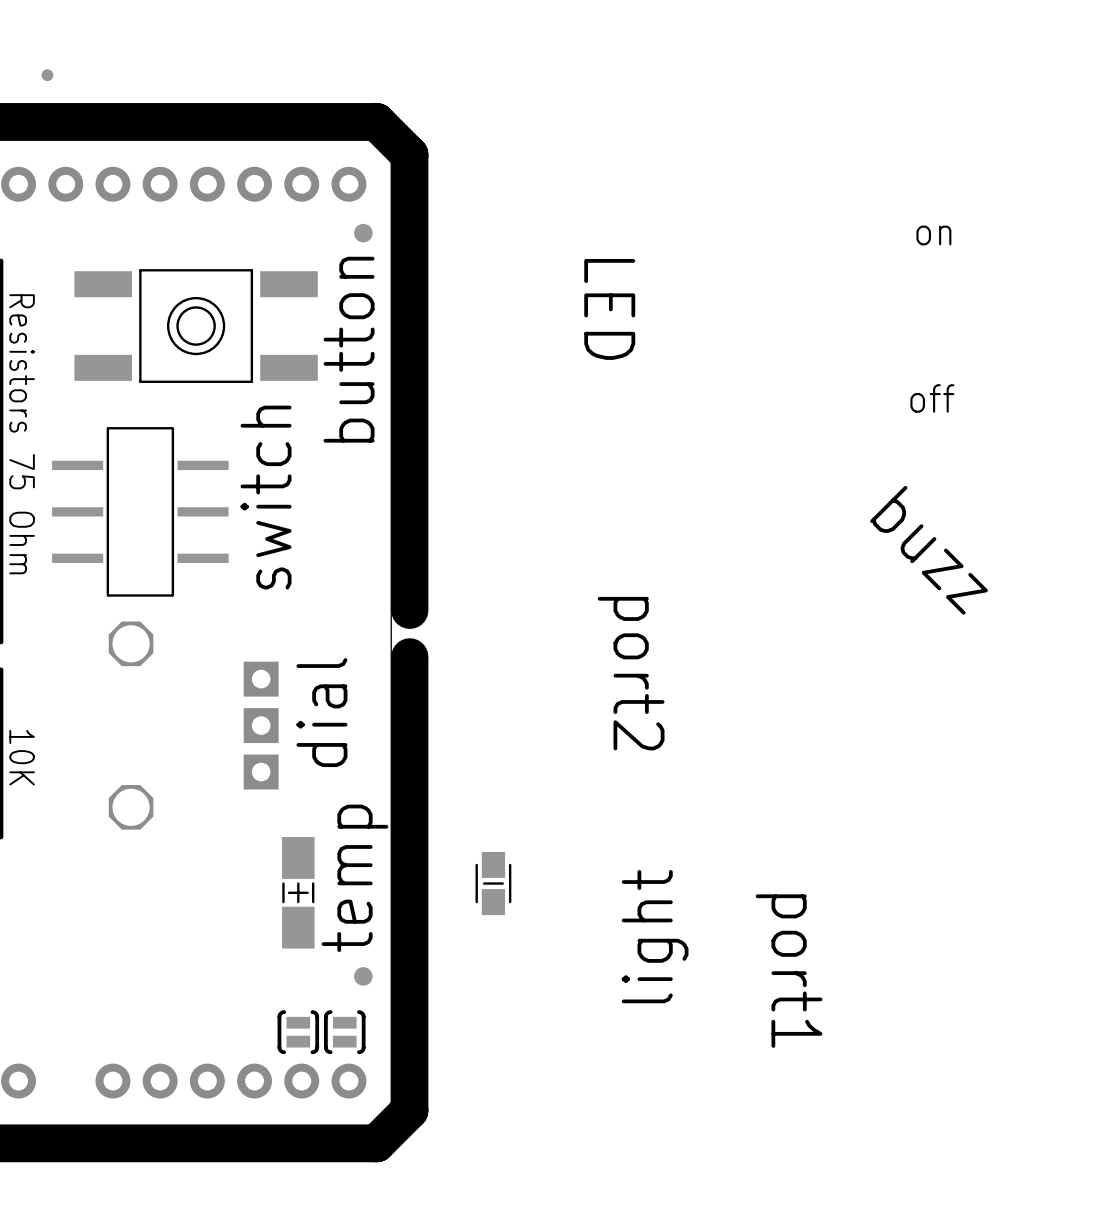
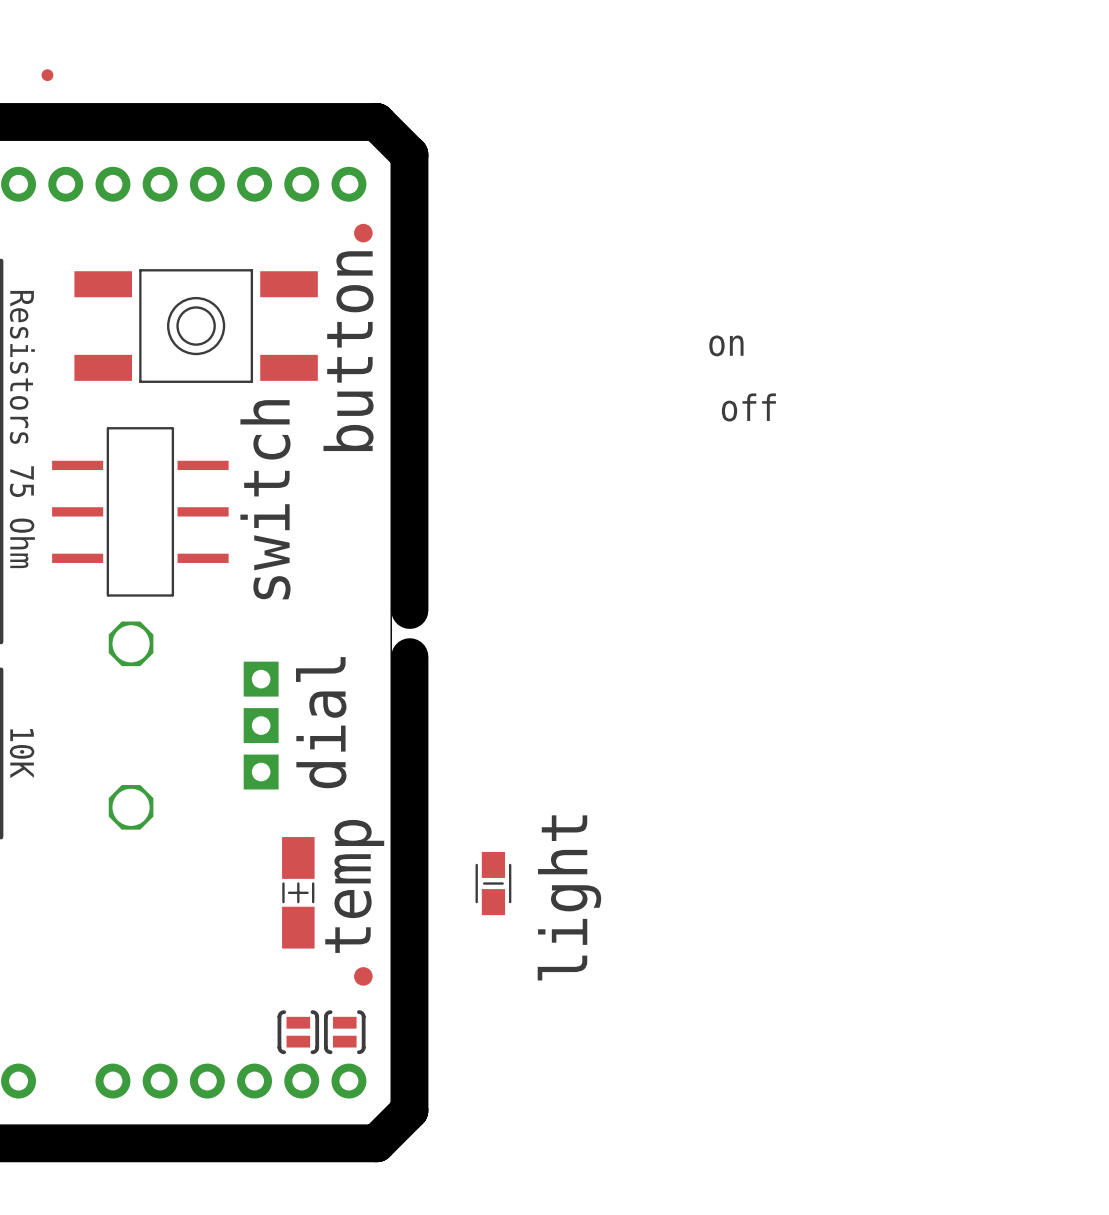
text position: on (933, 235) -> on (726, 345)
text: LED (609, 309) -> none
text position: off (932, 398) -> off (748, 407)
text: buzz (929, 550) -> none
text: port2 (631, 673) -> none
text position: light (655, 936) -> light (569, 897)
text: port1 (789, 971) -> none

